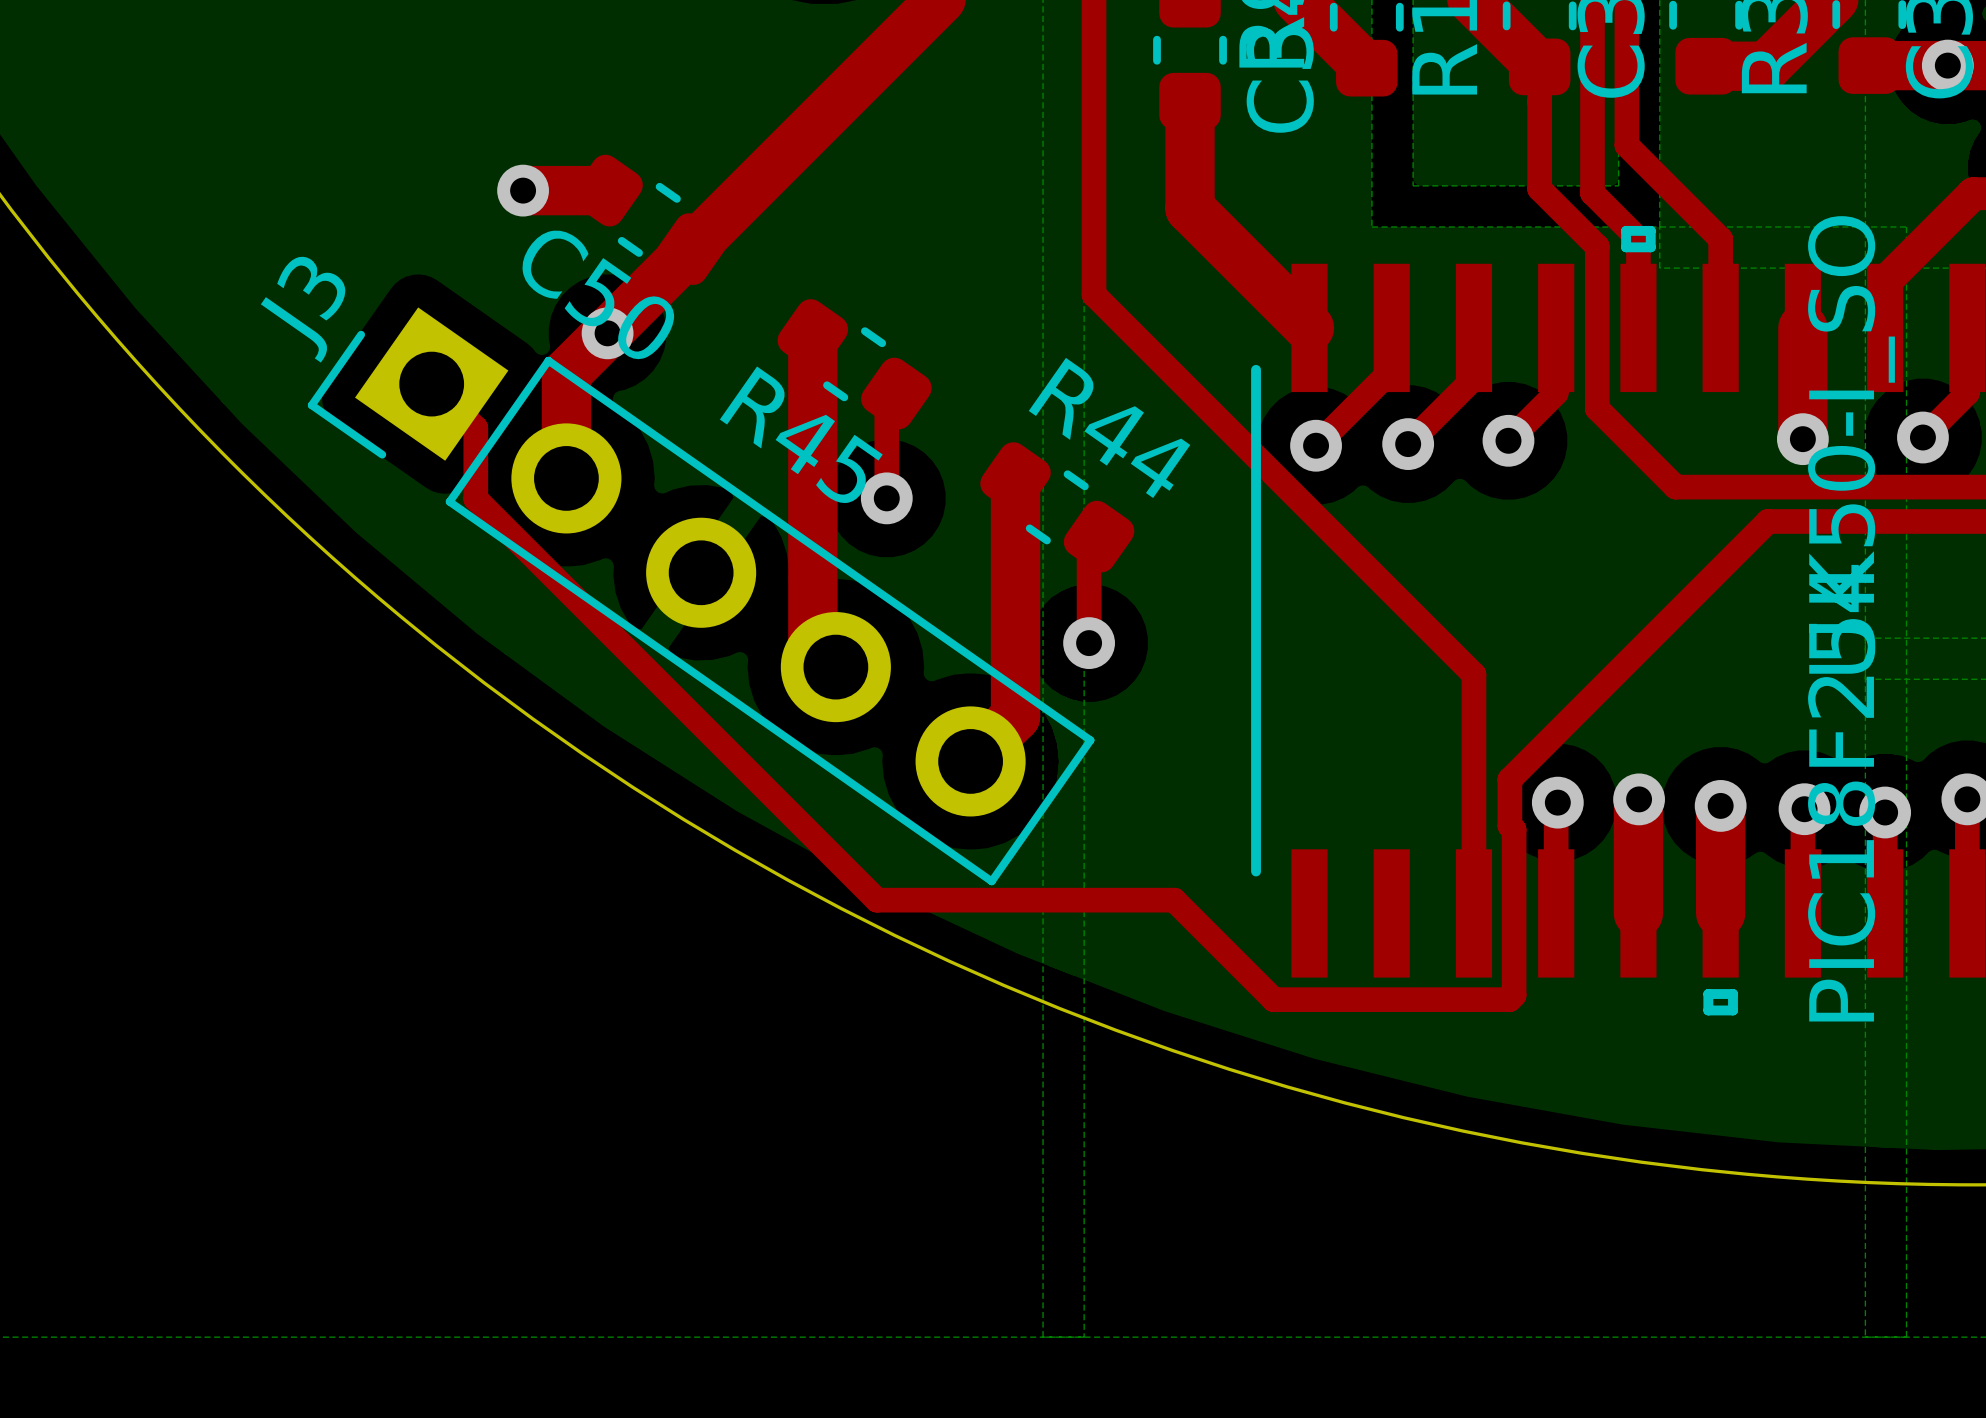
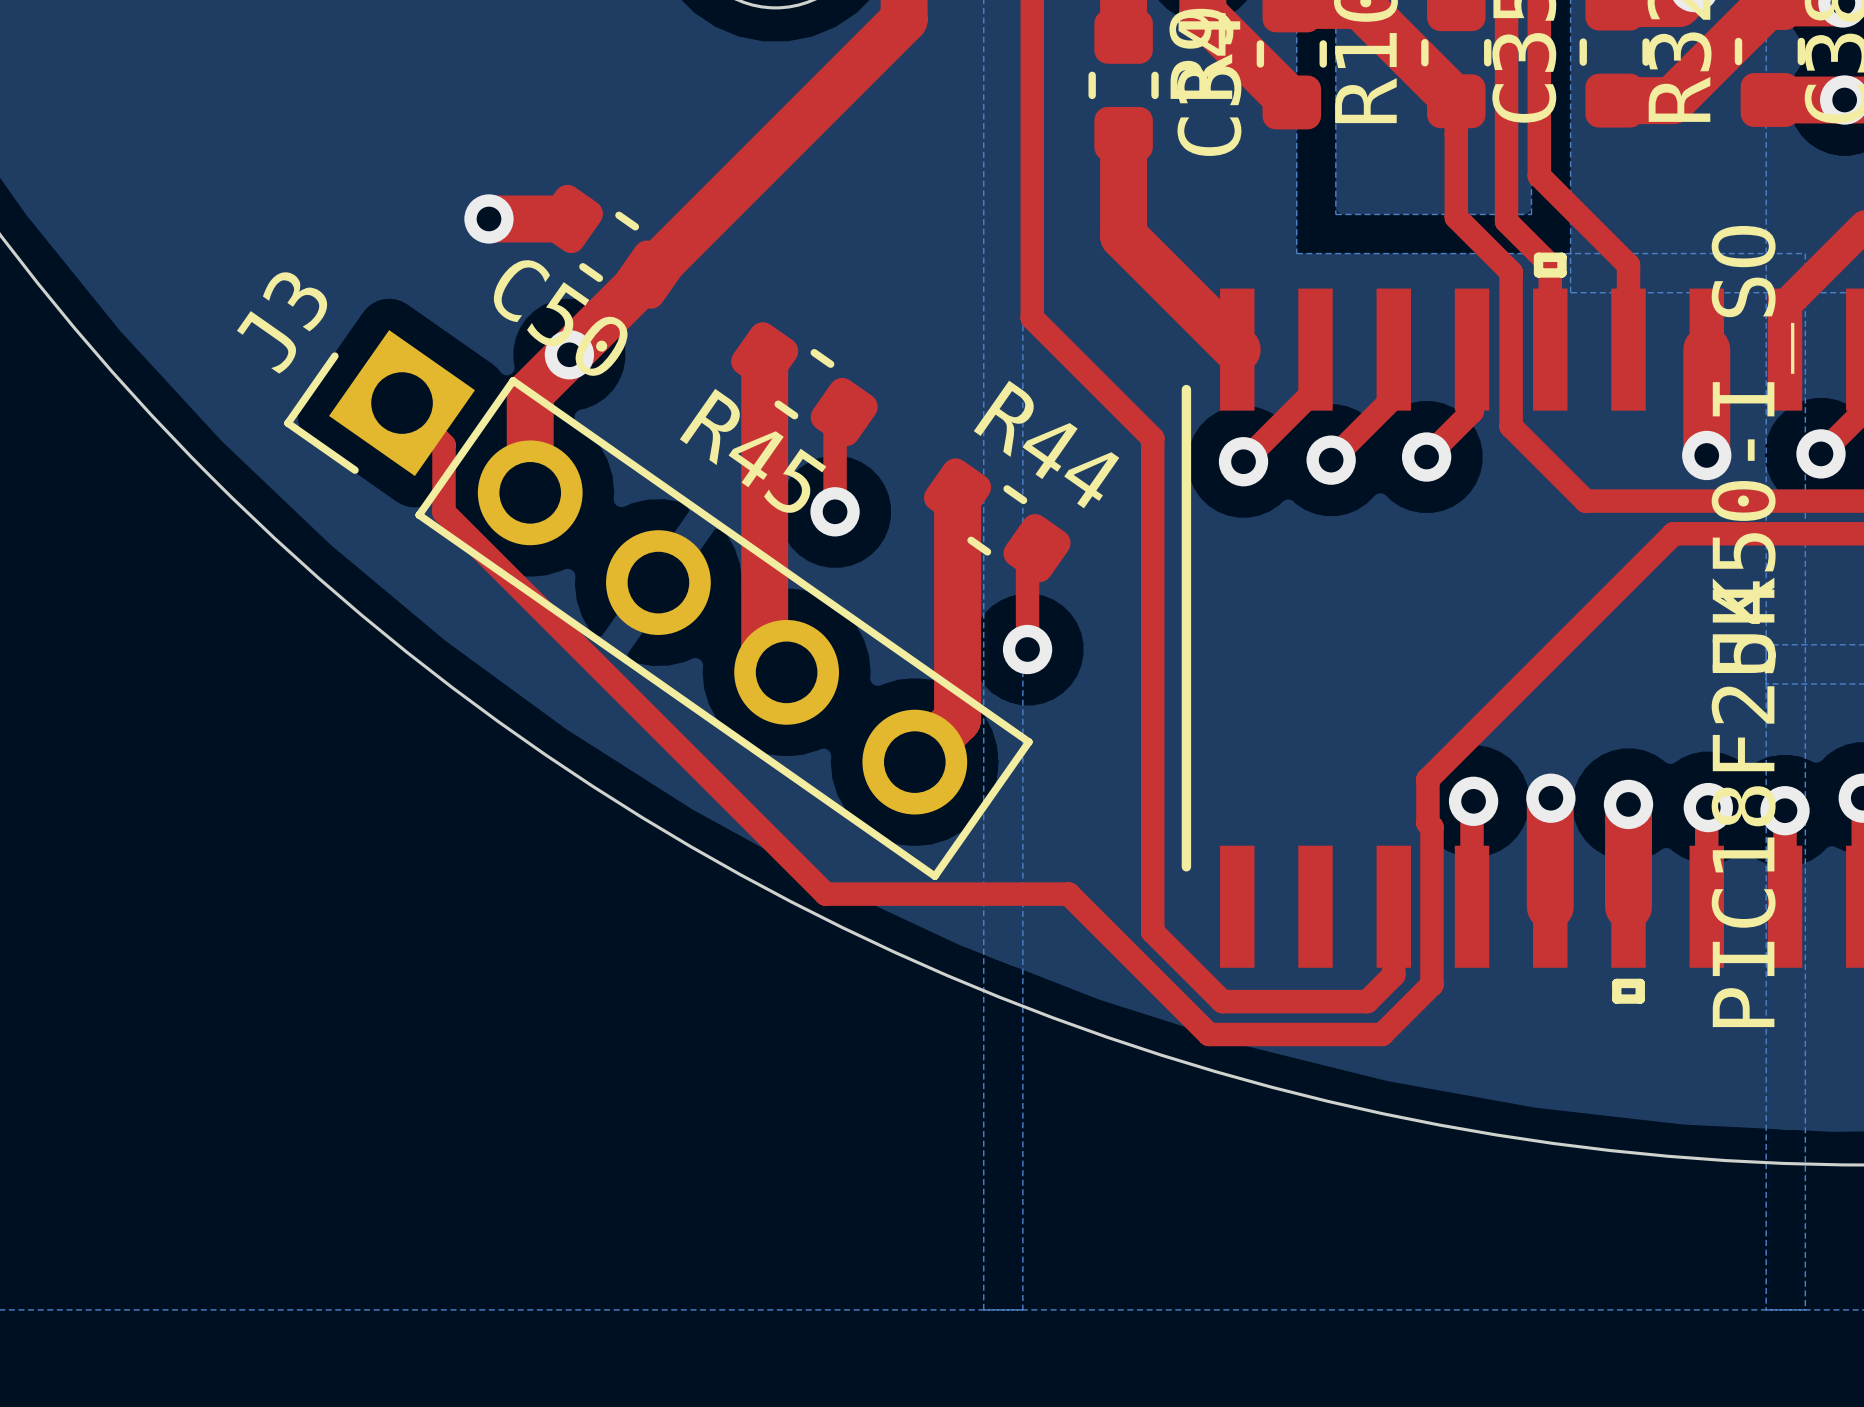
top track: (1220, 421) (1473, 674) (1473, 913) -> (1152, 438) (1152, 931) (1222, 1001) (1367, 1001) (1393, 975) (1393, 906)
top track: (1132, 900) (1174, 900) (1273, 999) (1509, 999) -> (1068, 894) (1209, 1034) (1382, 1034) (1427, 988)

